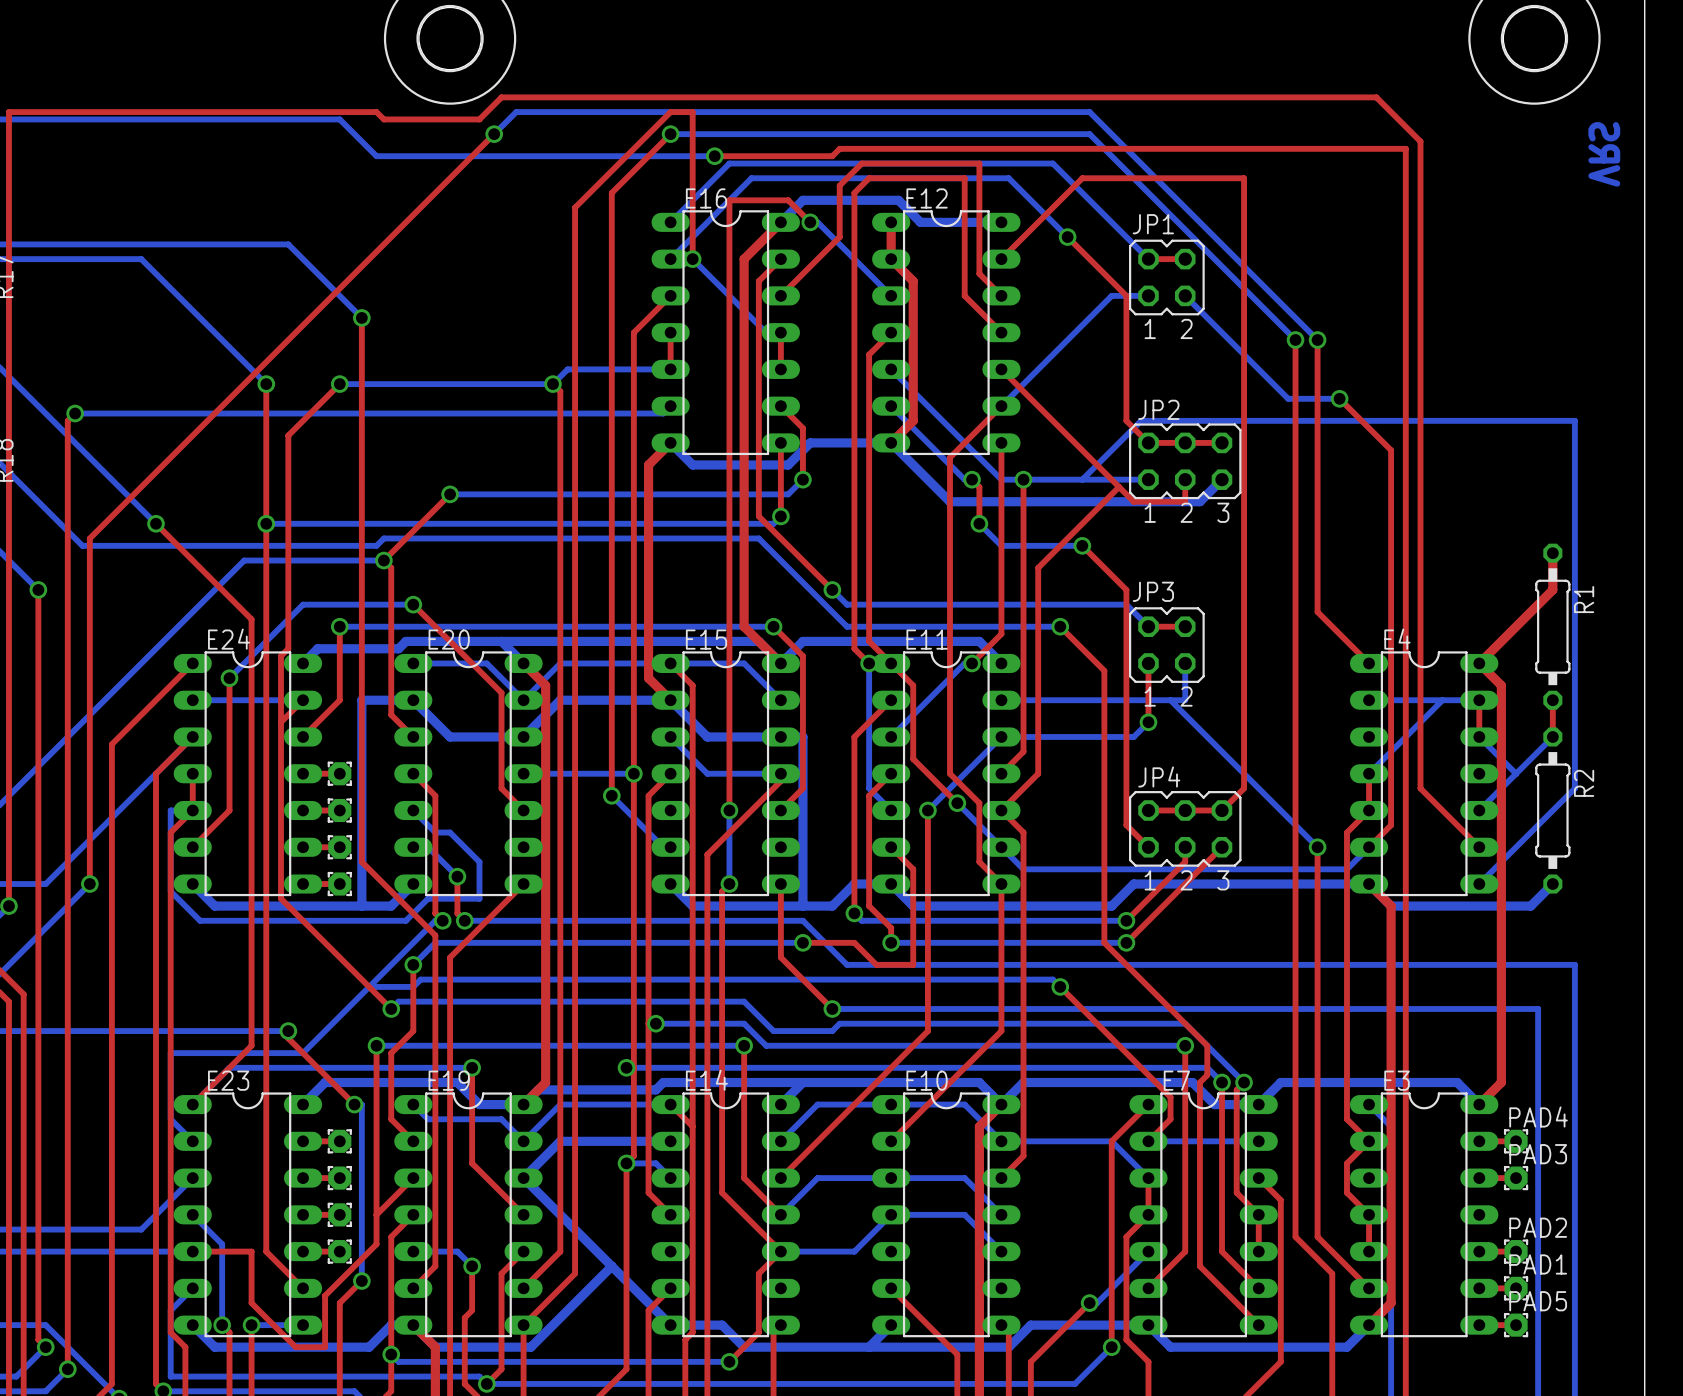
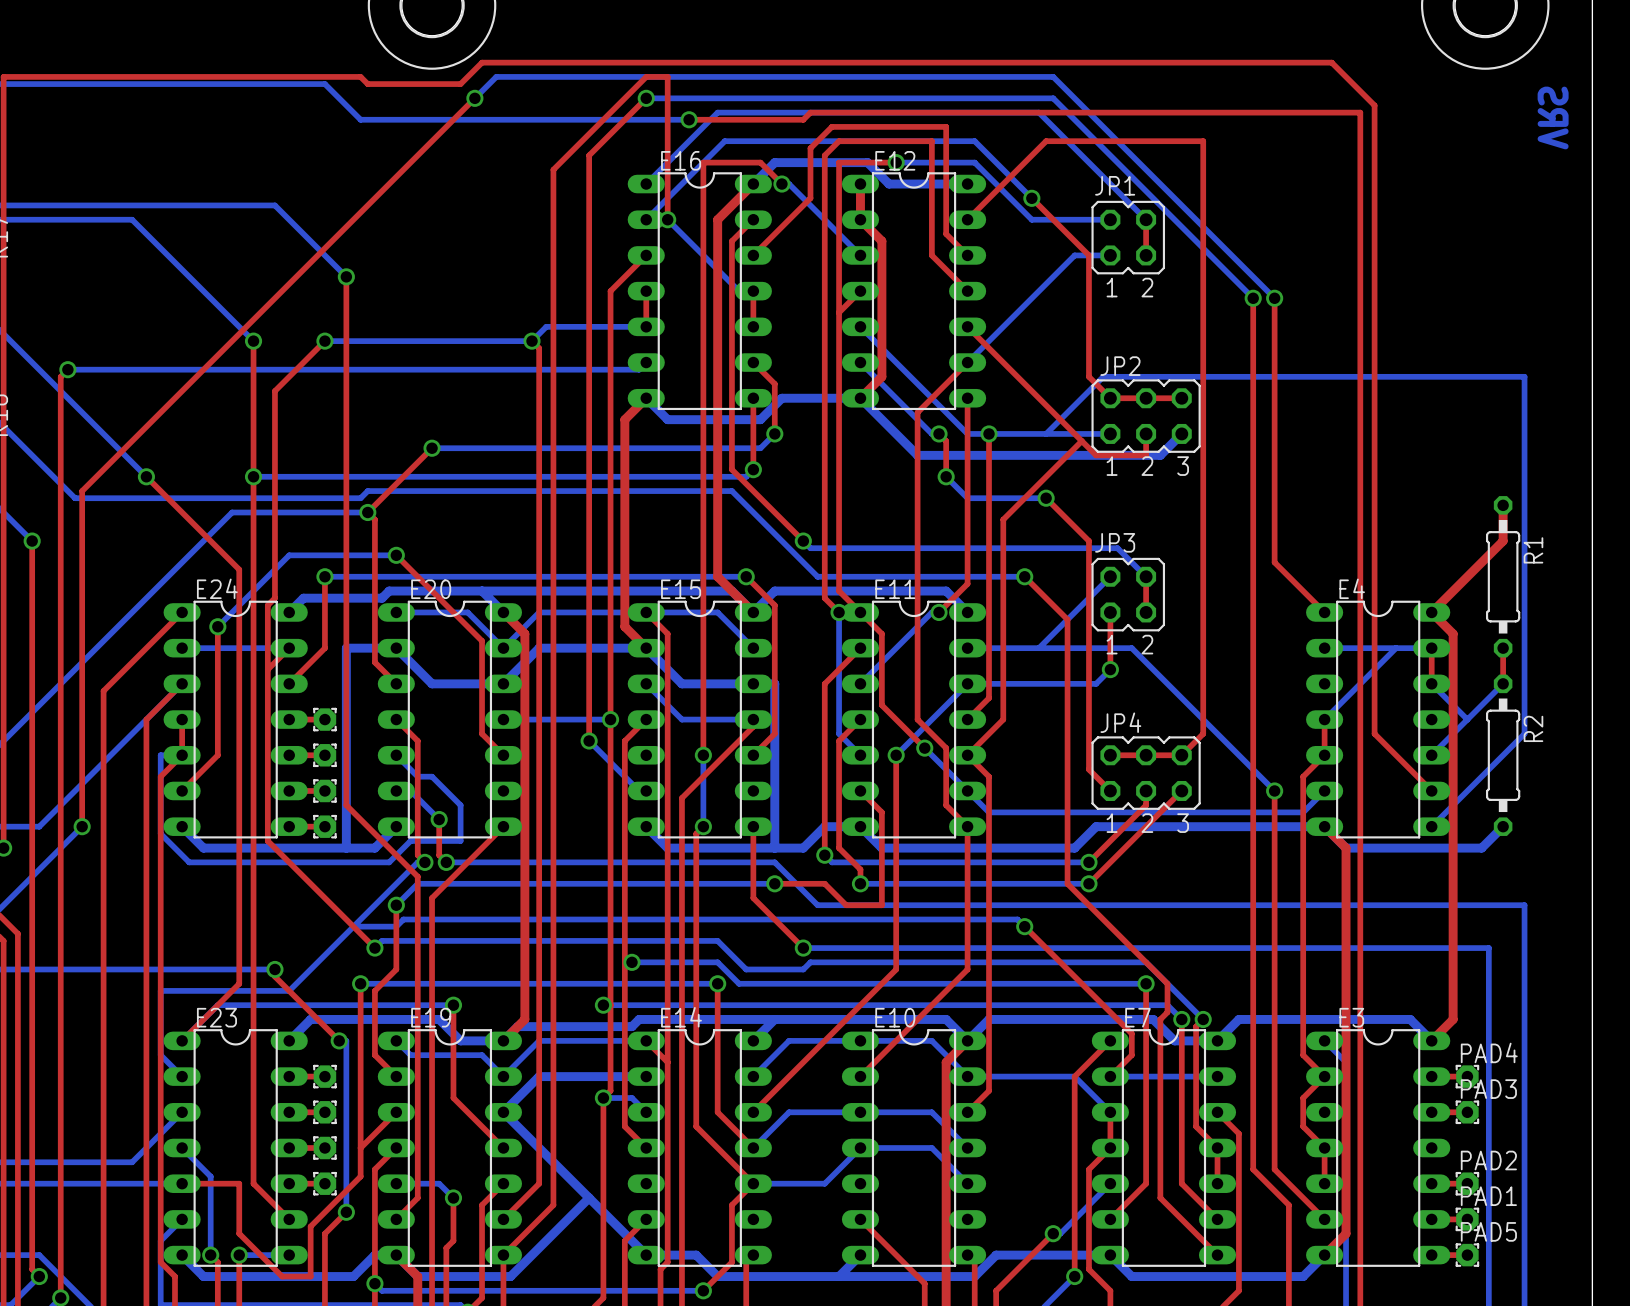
bottom track: (729, 163) (1052, 163) (1148, 259) -> (703, 126) (717, 112) (1038, 112) (1146, 219)
bottom track: none -> (896, 162) (974, 162) (1031, 219) (1110, 219)
top track: none -> (896, 162) (839, 162) (839, 312)
via: none -> (896, 162)
top track: (1148, 259) (1185, 259) -> (1146, 255) (1146, 219)
bottom track: (1185, 295) (1288, 398) (1339, 398) -> none
top track: (1339, 398) (1391, 450) (1391, 825) (1369, 847) -> none
via: (1339, 398) -> none
bottom track: (839, 597) (847, 604) (1126, 604) (1148, 626) -> (810, 548) (1117, 548) (1146, 576)
bottom track: none -> (1110, 576) (1038, 648)
top track: (1148, 626) (1185, 626) -> (1146, 612) (1146, 576)
bottom track: (1185, 663) (1185, 700) (1170, 700) -> none

